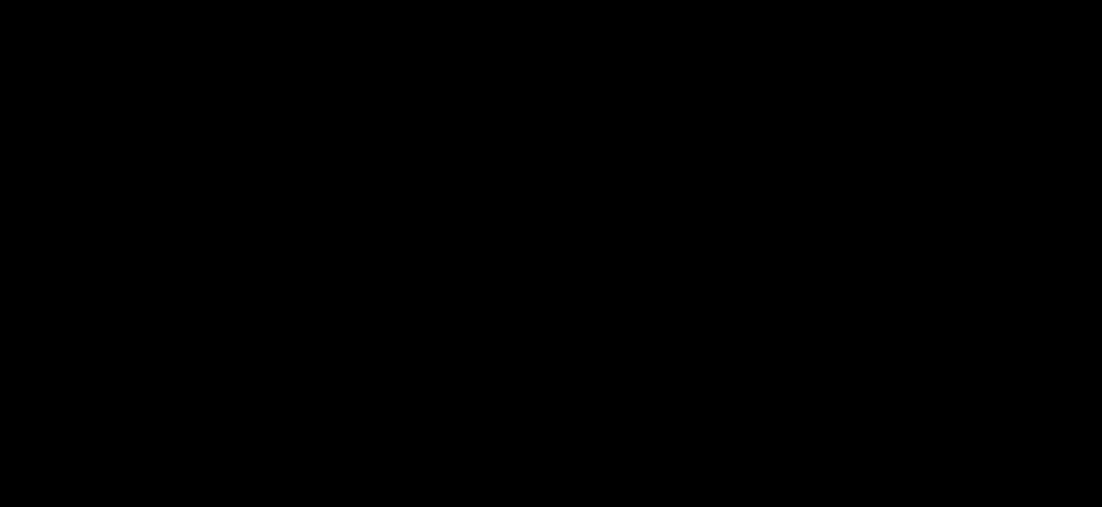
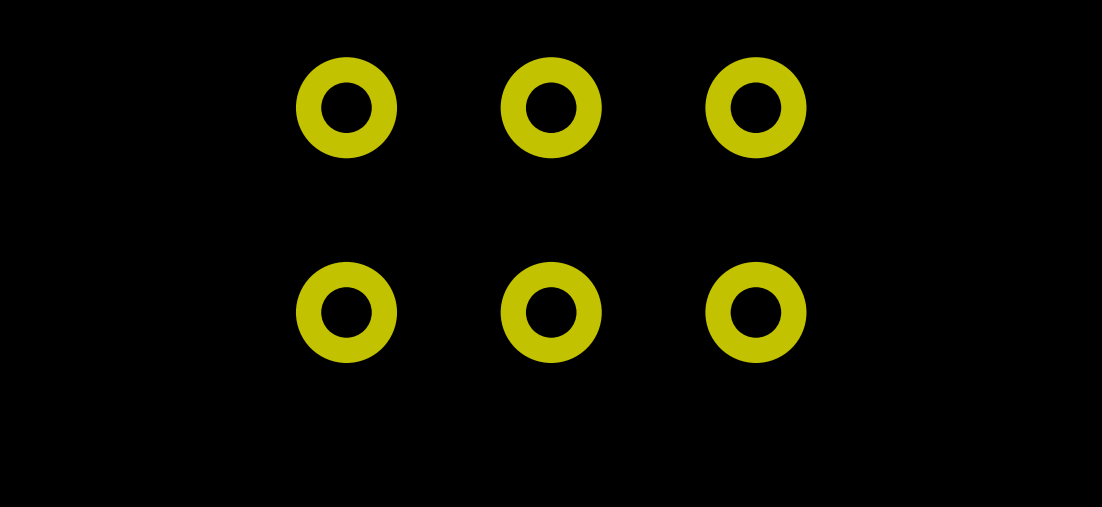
part: none -> (346, 107)
part: none -> (551, 107)
part: none -> (755, 107)
part: none -> (346, 312)
part: none -> (551, 312)
part: none -> (755, 312)

